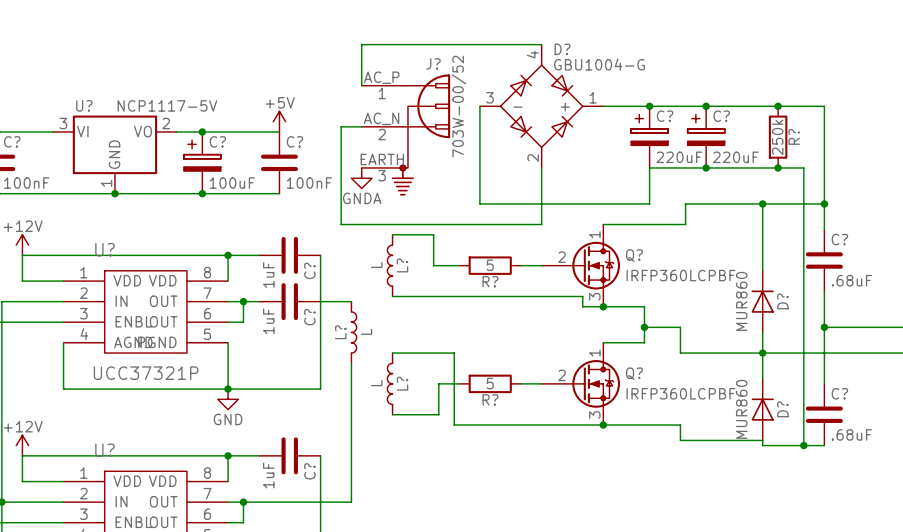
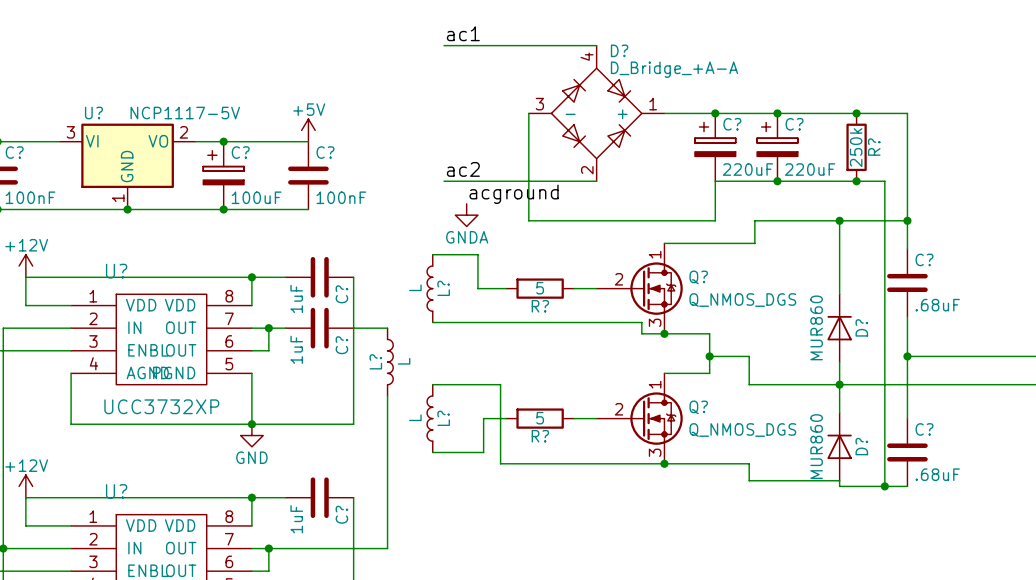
label: none -> ac1 (463, 33)
wire: (402, 44) (361, 44) (361, 85) -> none
D? value: GBU1004-G (599, 64) -> D_Bridge_+A-A (674, 69)
wire: (361, 126) (341, 126) (341, 224) (541, 224) (541, 167) -> (444, 181) (596, 181)
J?: 703W-00/52 (405, 134) -> none
label: none -> ac2 (463, 169)
power symbol position: GNDA (361, 178) -> GNDA (466, 215)
label: none -> acground (514, 194)
Q? value: IRFP360LCPBF (681, 275) -> Q_NMOS_DGS (742, 300)
U? value: UCC37321P (146, 373) -> UCC3732XP (161, 406)
Q? value: IRFP360LCPBF (681, 393) -> Q_NMOS_DGS (742, 430)

